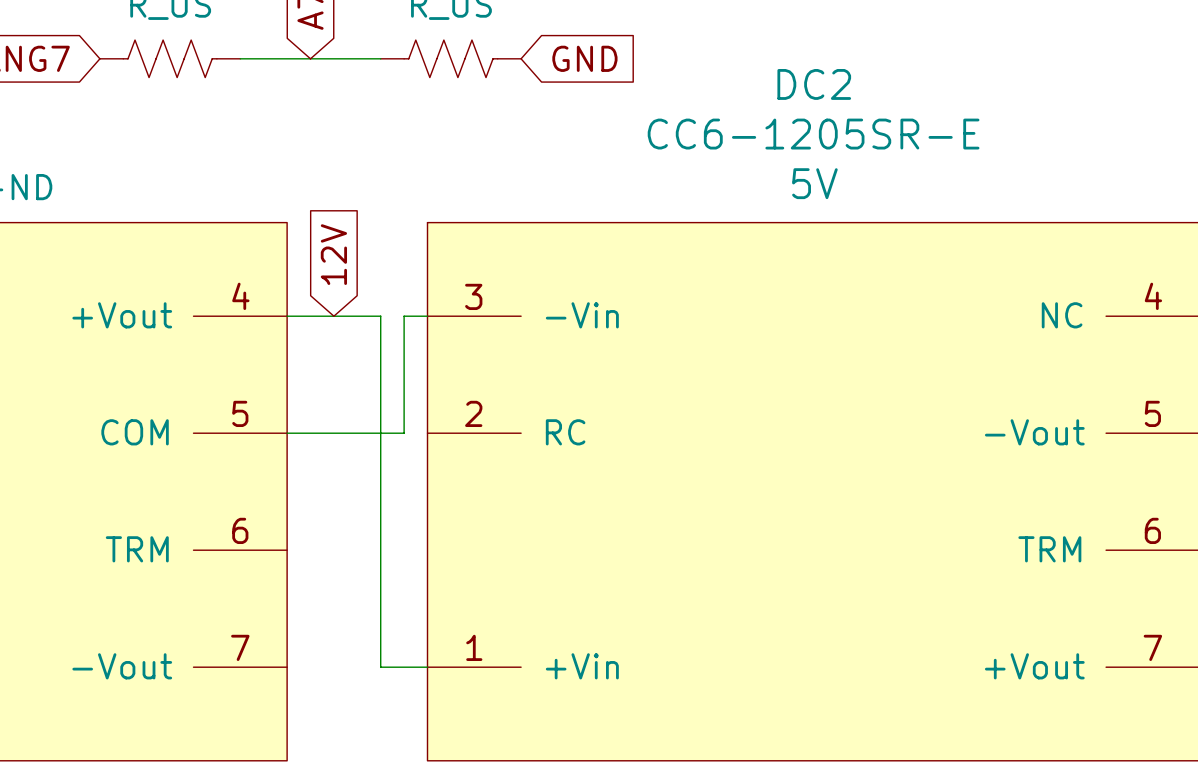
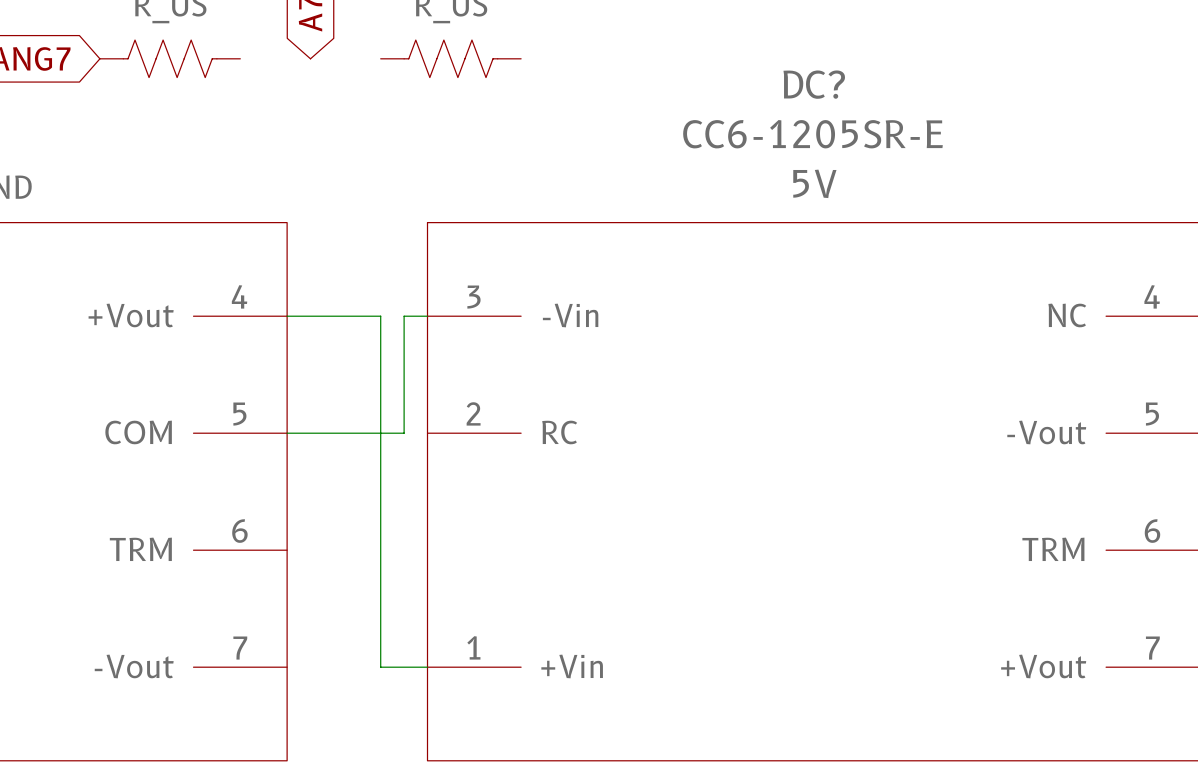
wire: (240, 58) (380, 58) -> none
global label: GND (584, 58) -> none
DC2 name: DC2 (814, 84) -> DC? (814, 84)
global label: 12V (333, 254) -> none

